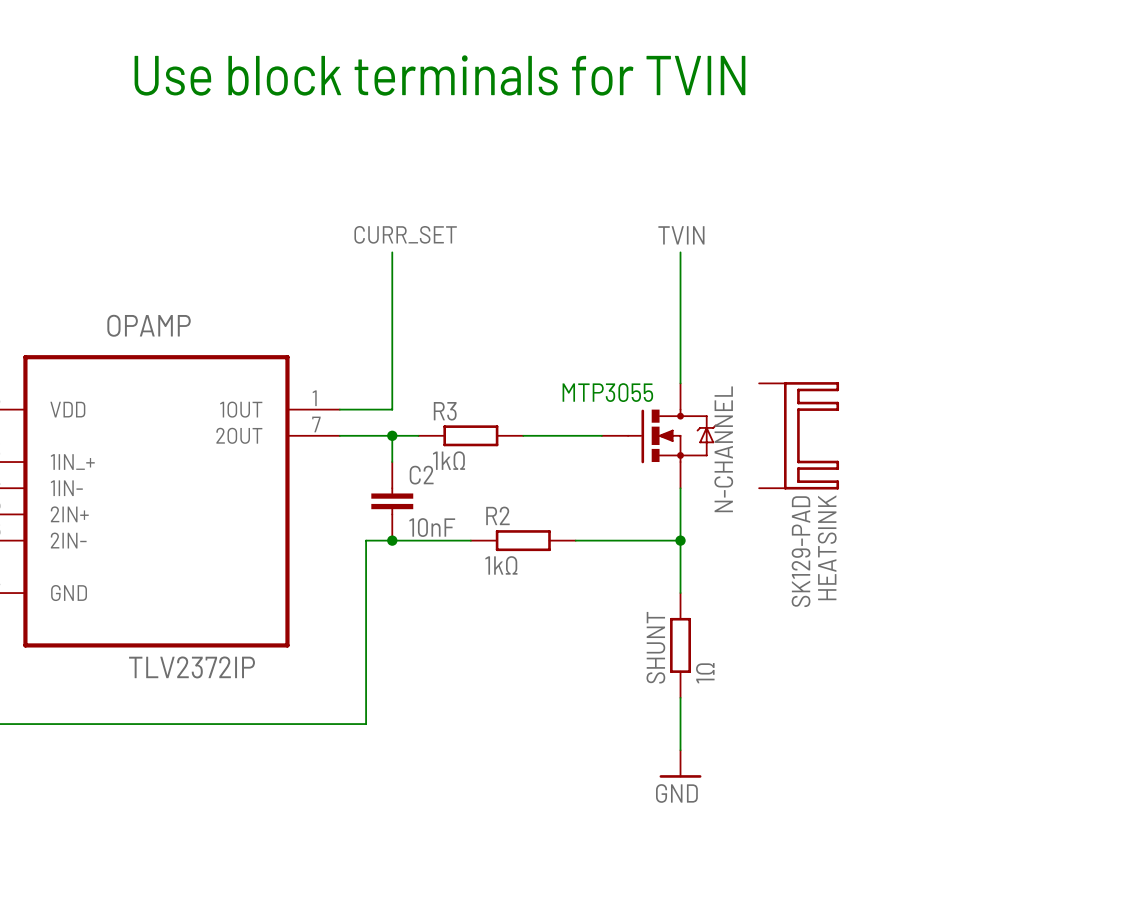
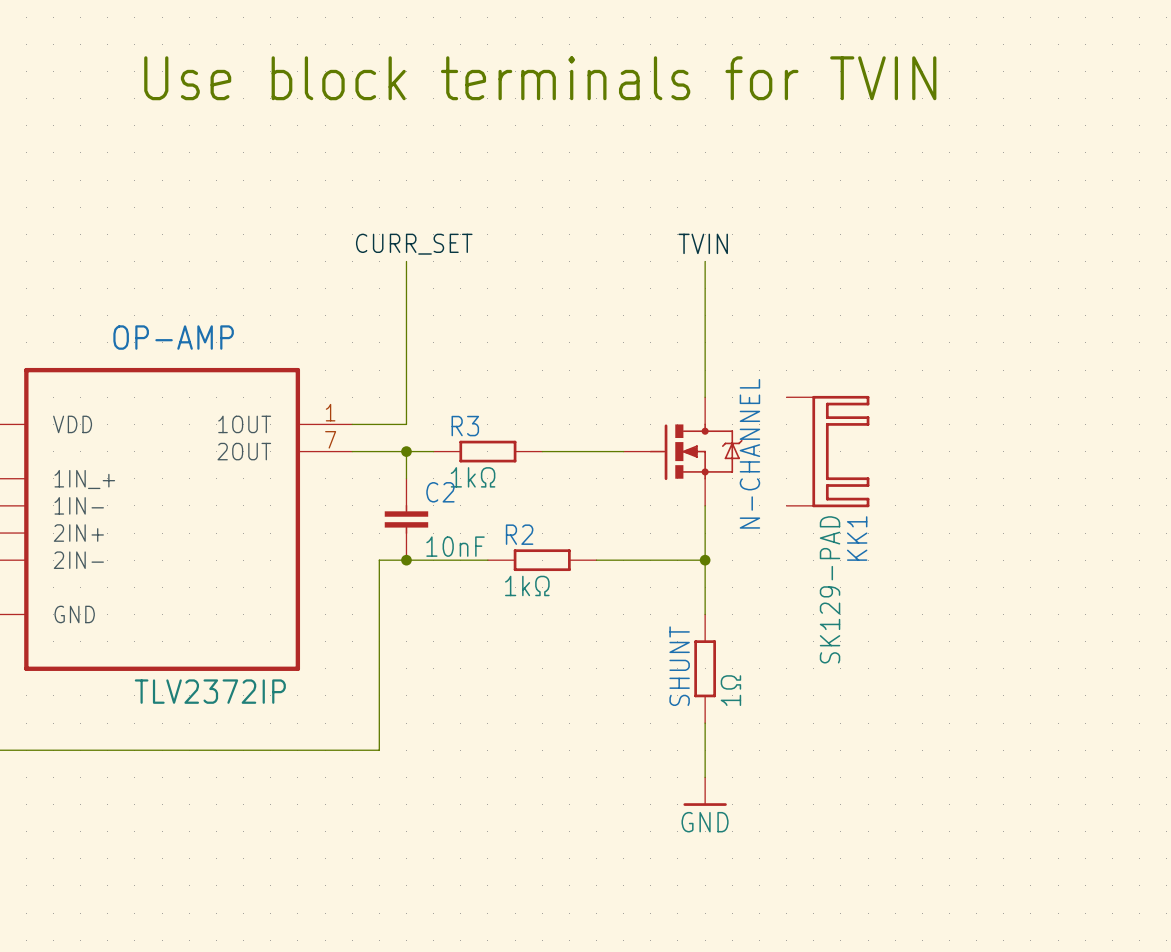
OPAMP name: OPAMP (149, 325) -> OP-AMP (173, 337)
text: MTP3055 (607, 392) -> none
HEATSINK name: HEATSINK (827, 547) -> KK1 (857, 538)

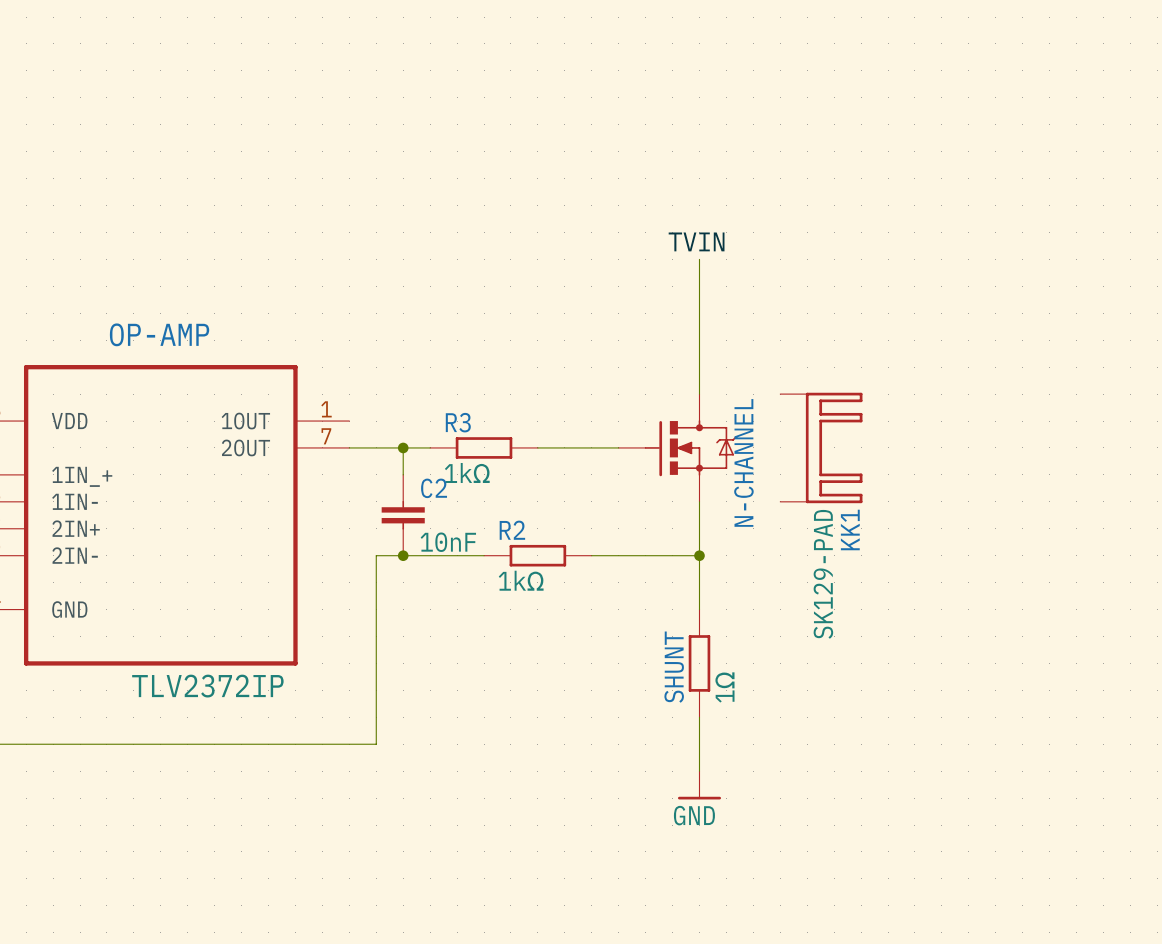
text: Use block terminals for TVIN (540, 78) -> none
label: CURR_SET (414, 244) -> none
wire: (406, 261) (406, 424) (352, 424) -> none

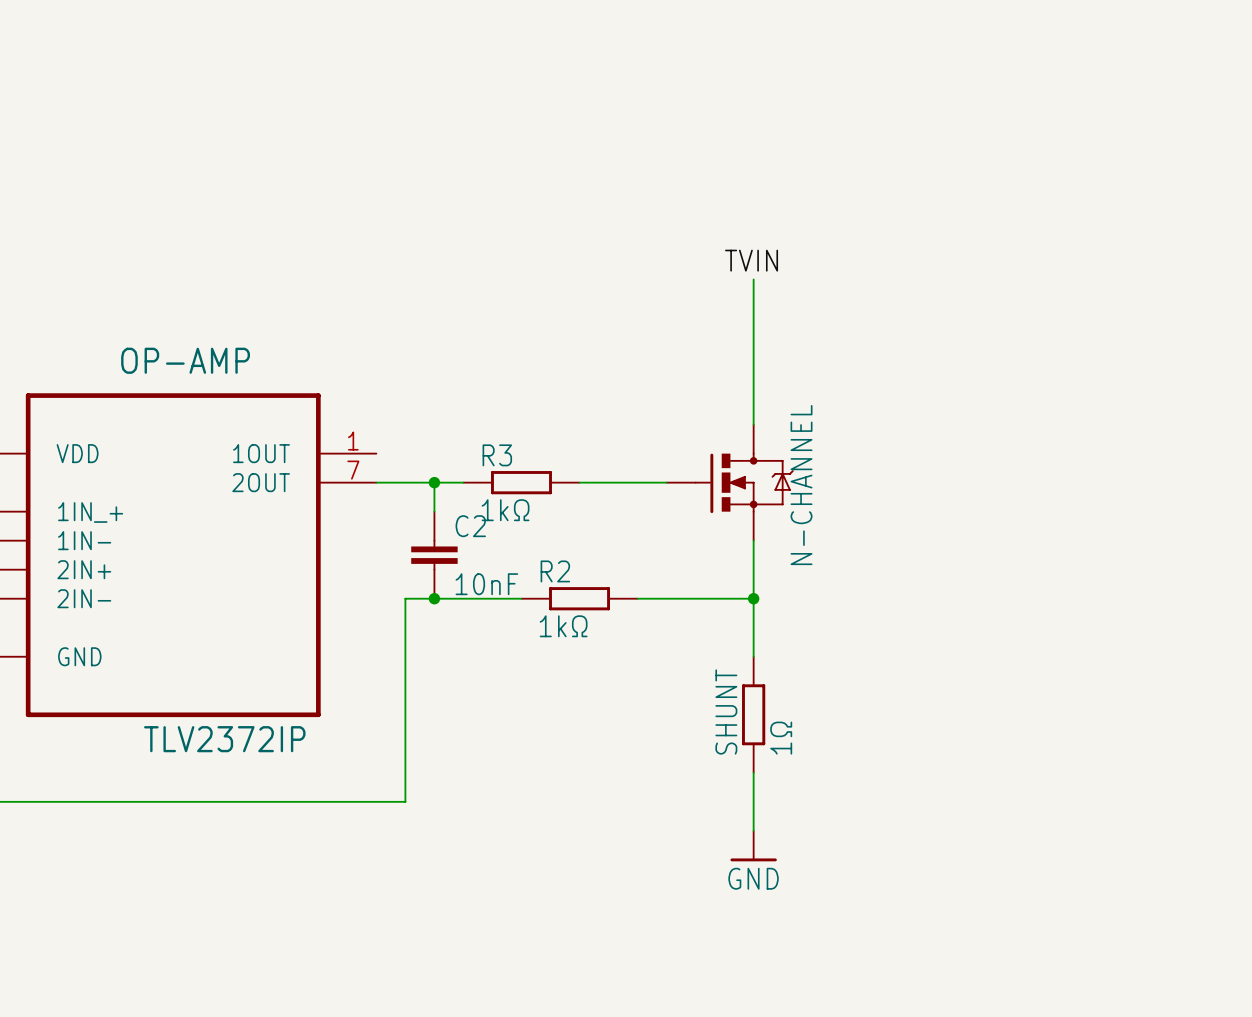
KK1: SK129-PAD (821, 447) -> none

